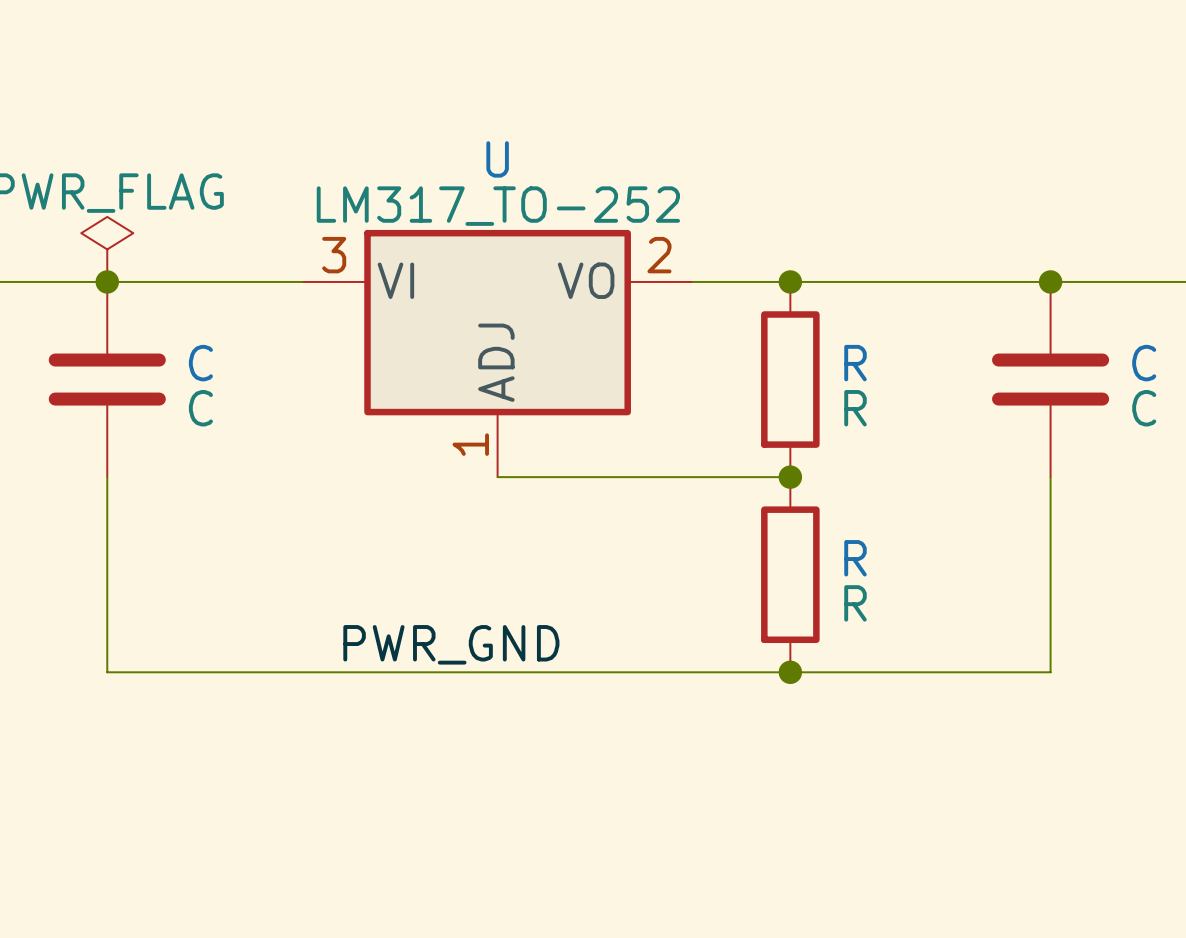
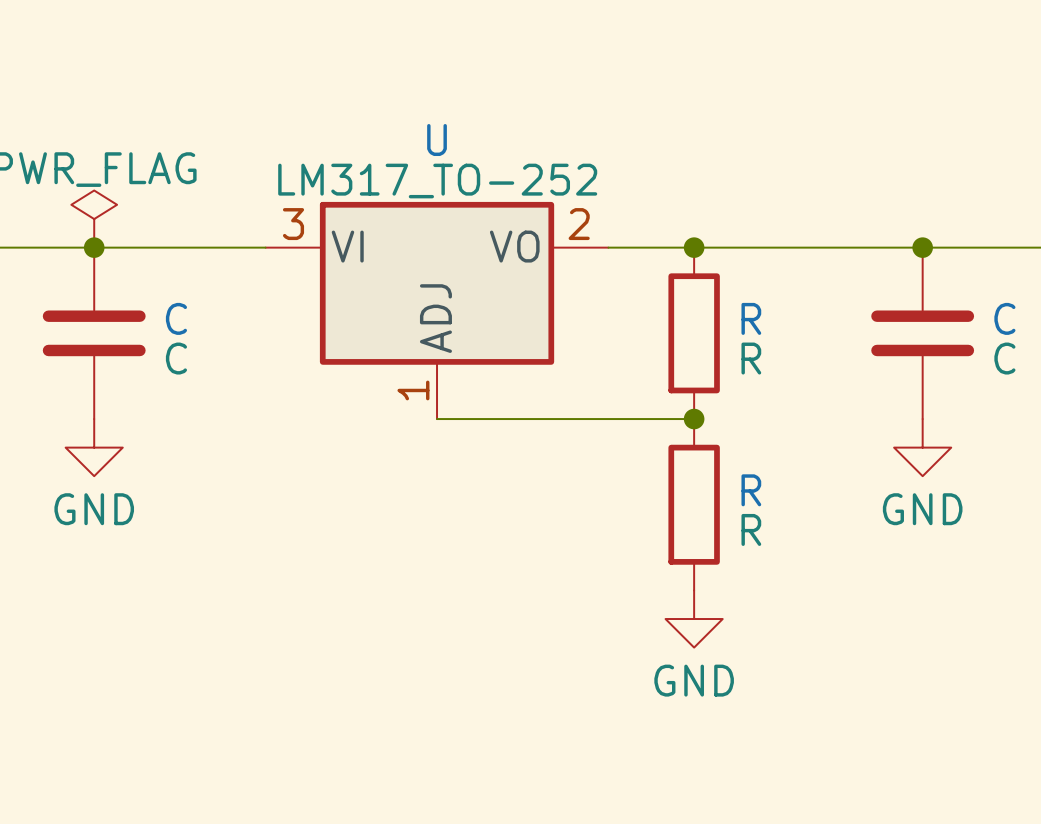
wire: (107, 477) (107, 672) (1050, 672) (1050, 477) -> none
power symbol: none -> GND (94, 447)
power symbol: none -> GND (922, 447)
label: PWR_GND (451, 644) -> none
junction: (790, 672) -> none
power symbol: none -> GND (694, 619)

